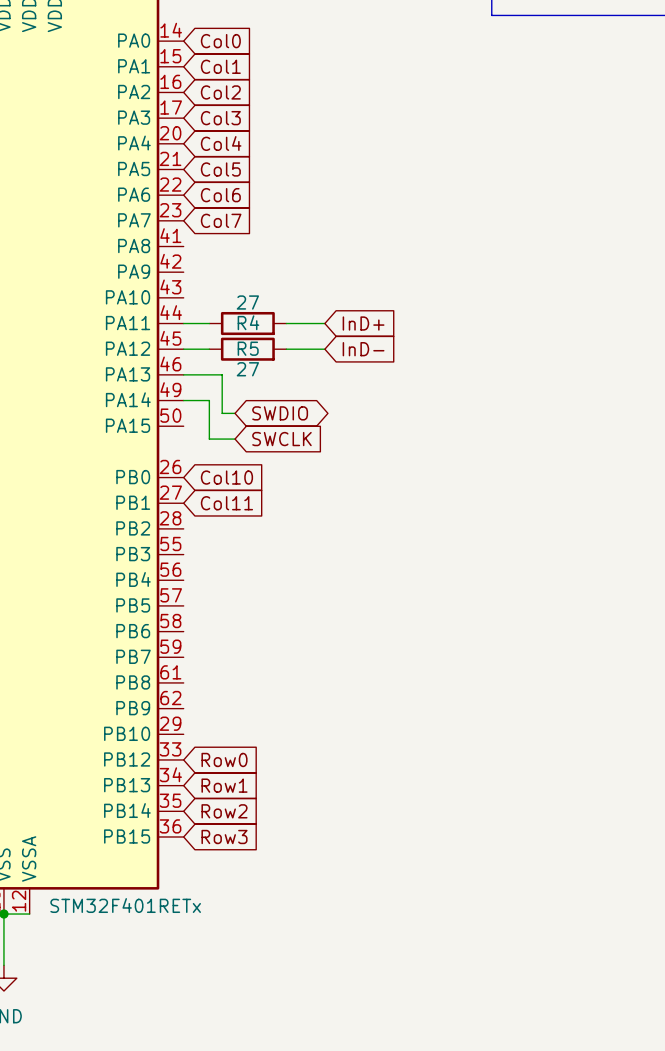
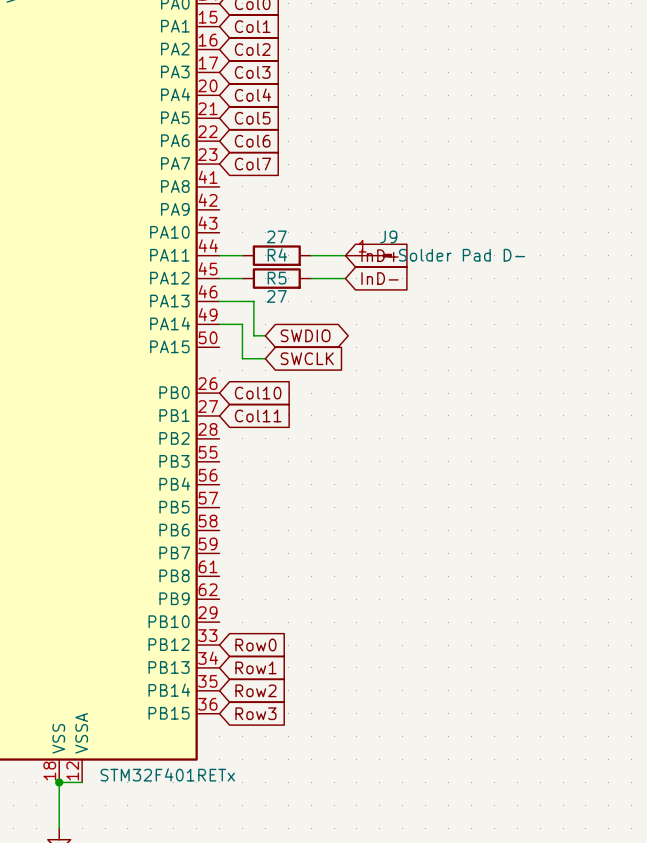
J9: none -> Solder Pad D- (368, 255)

